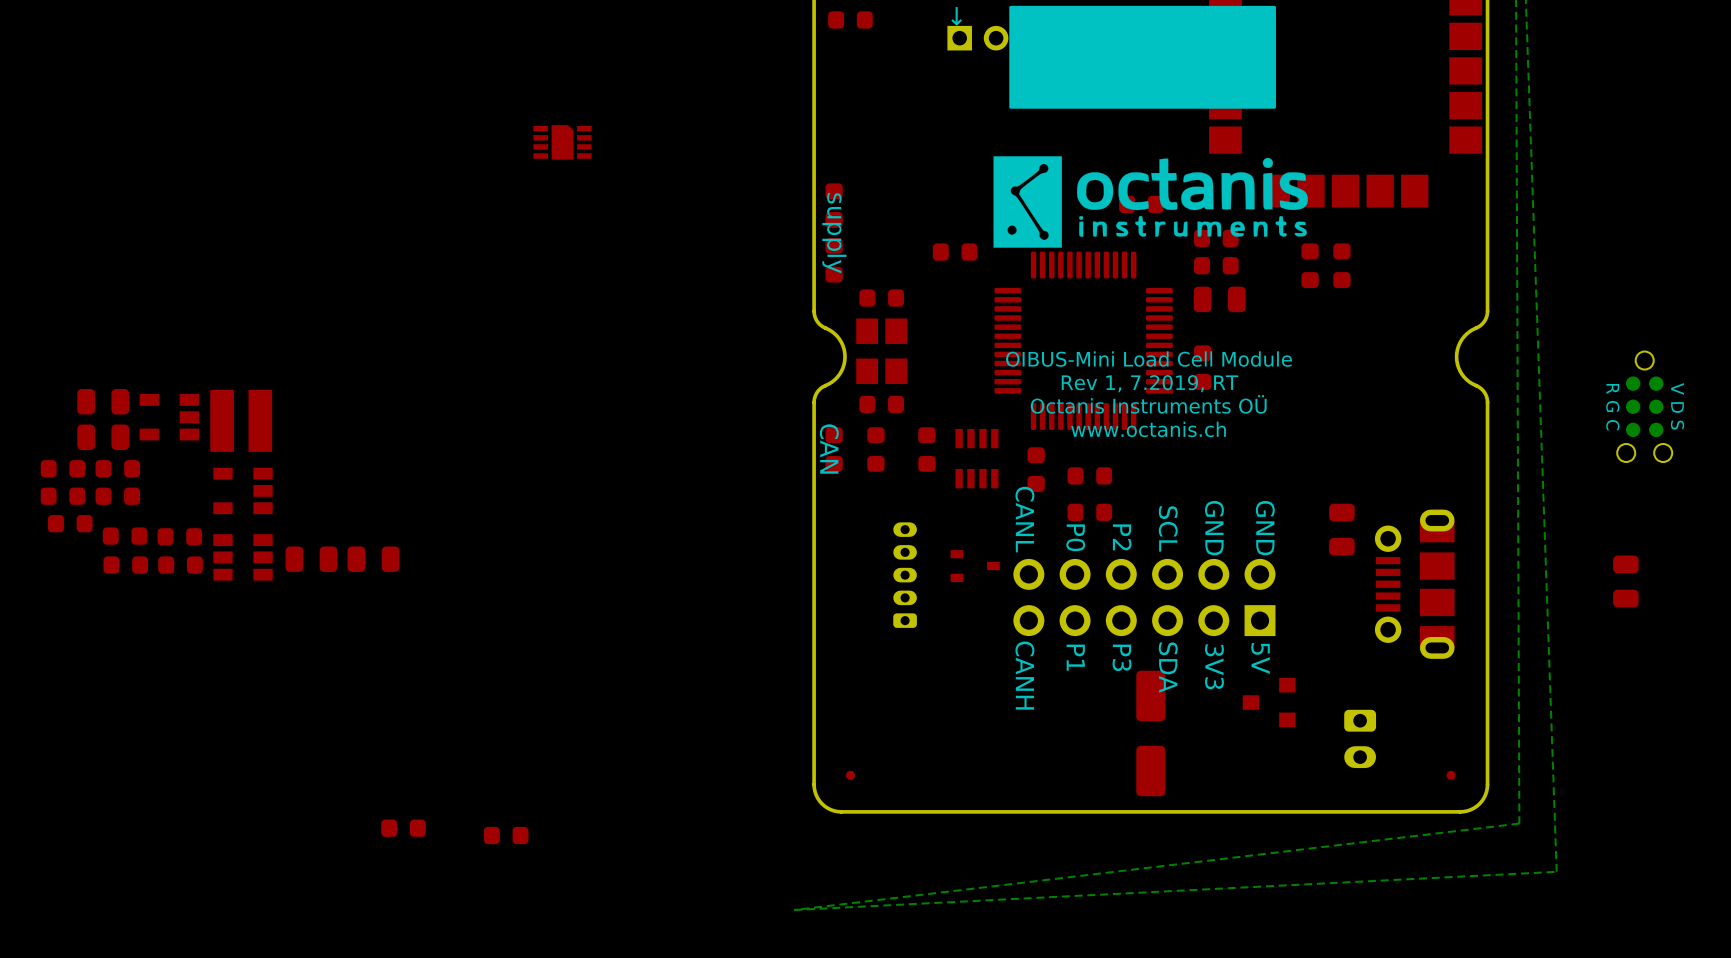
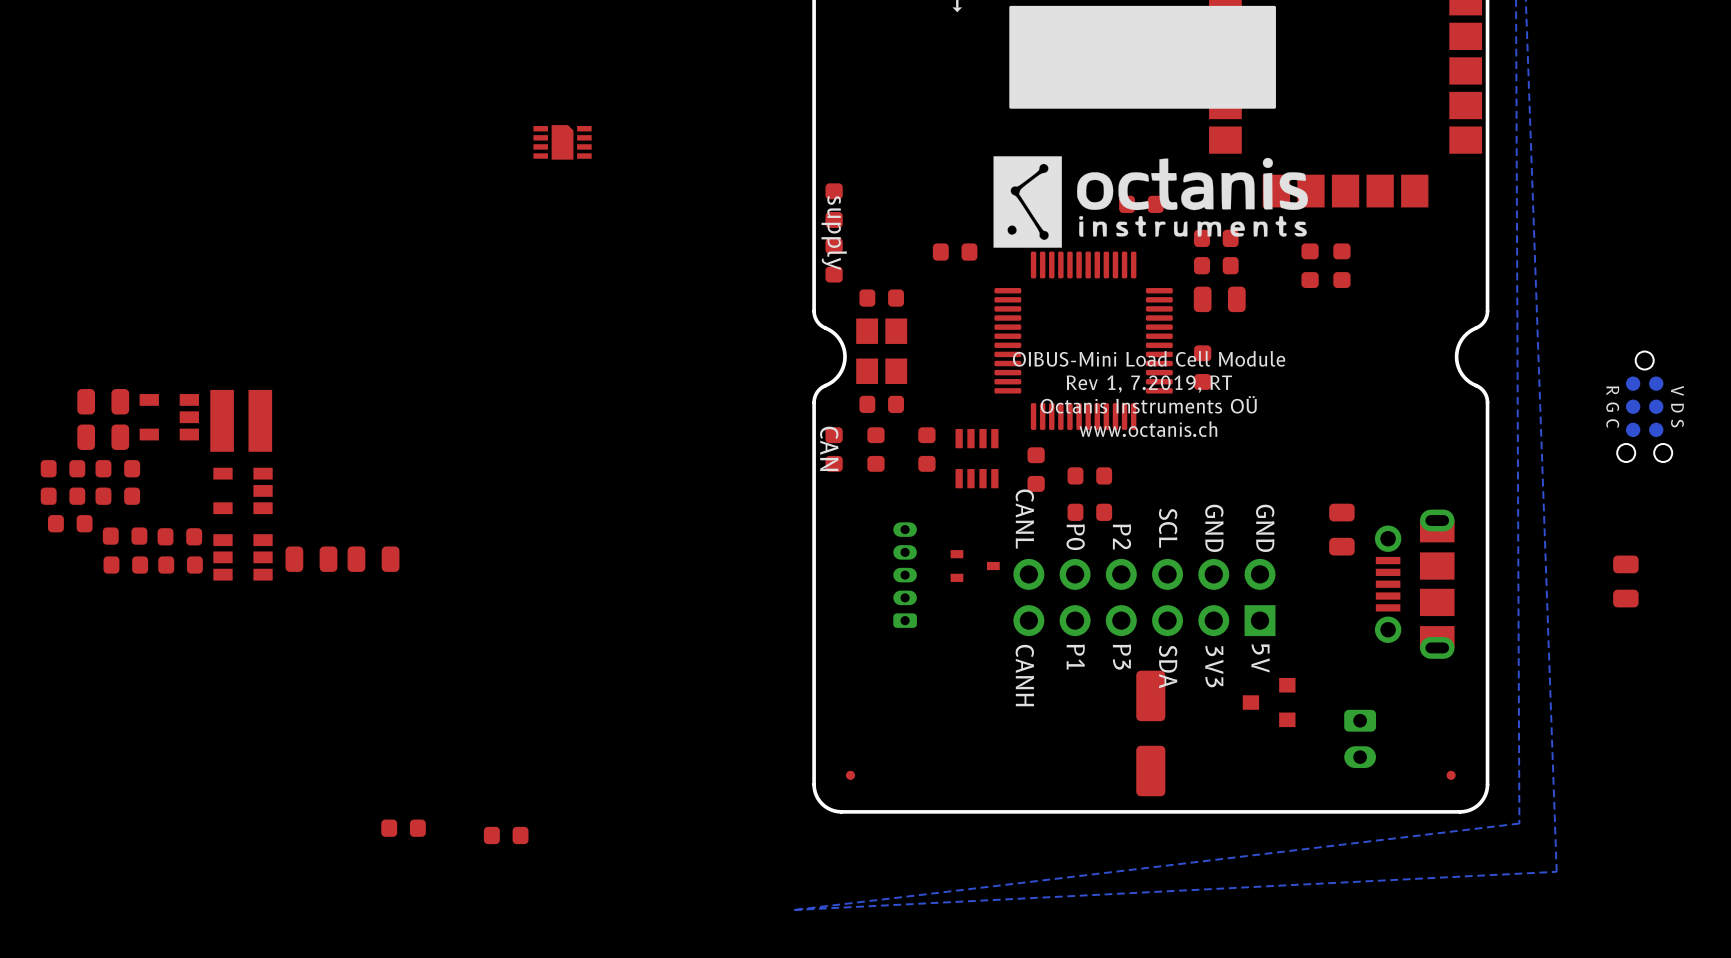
part: (850, 19) -> none
part: (977, 38) -> none

